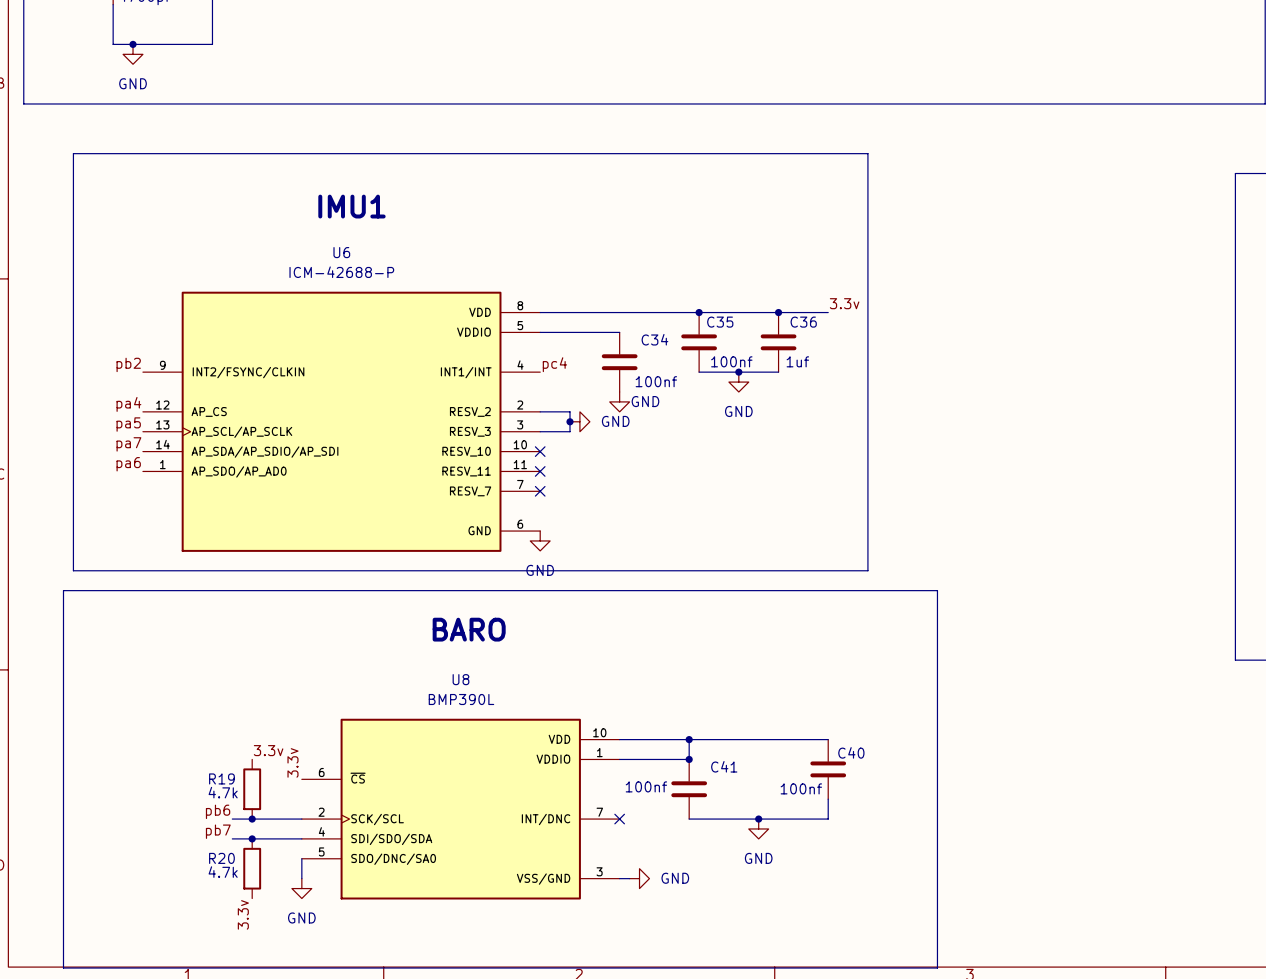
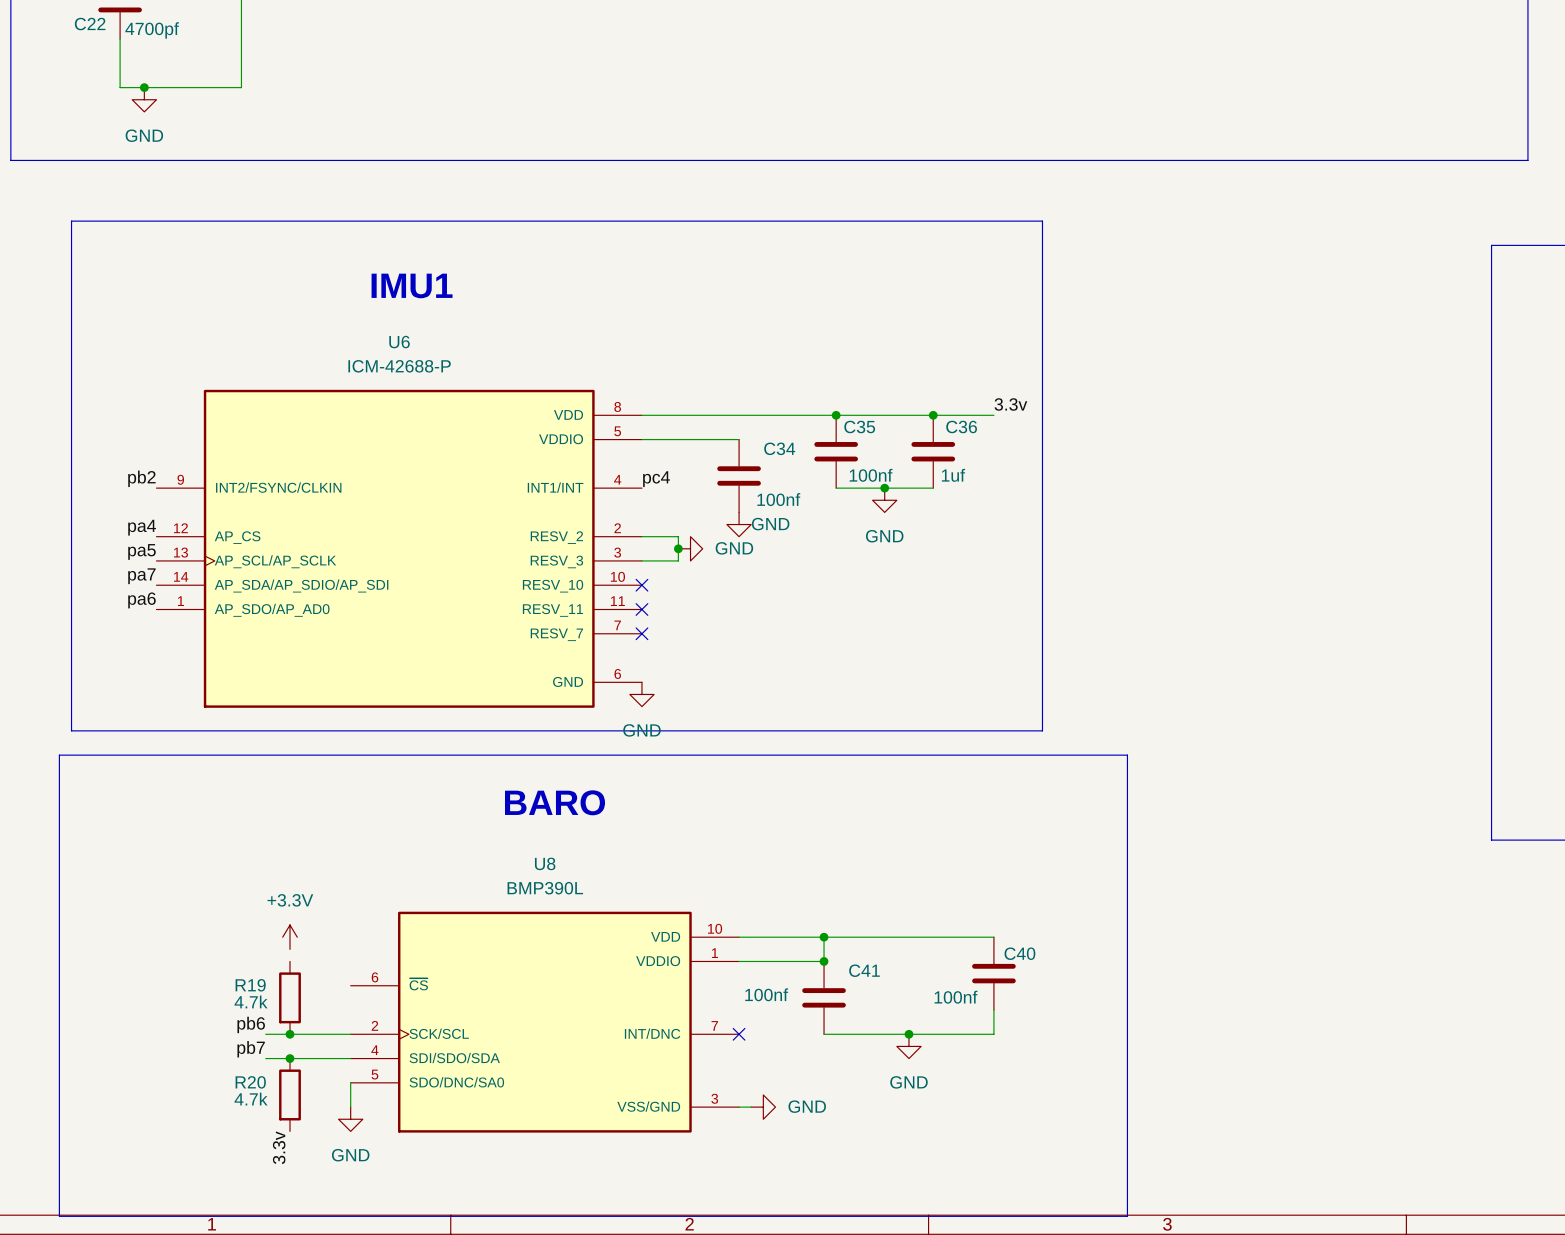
power symbol: none -> +3.3V (290, 937)
label: 3.3v (268, 750) -> none
label: 3.3v (292, 762) -> none

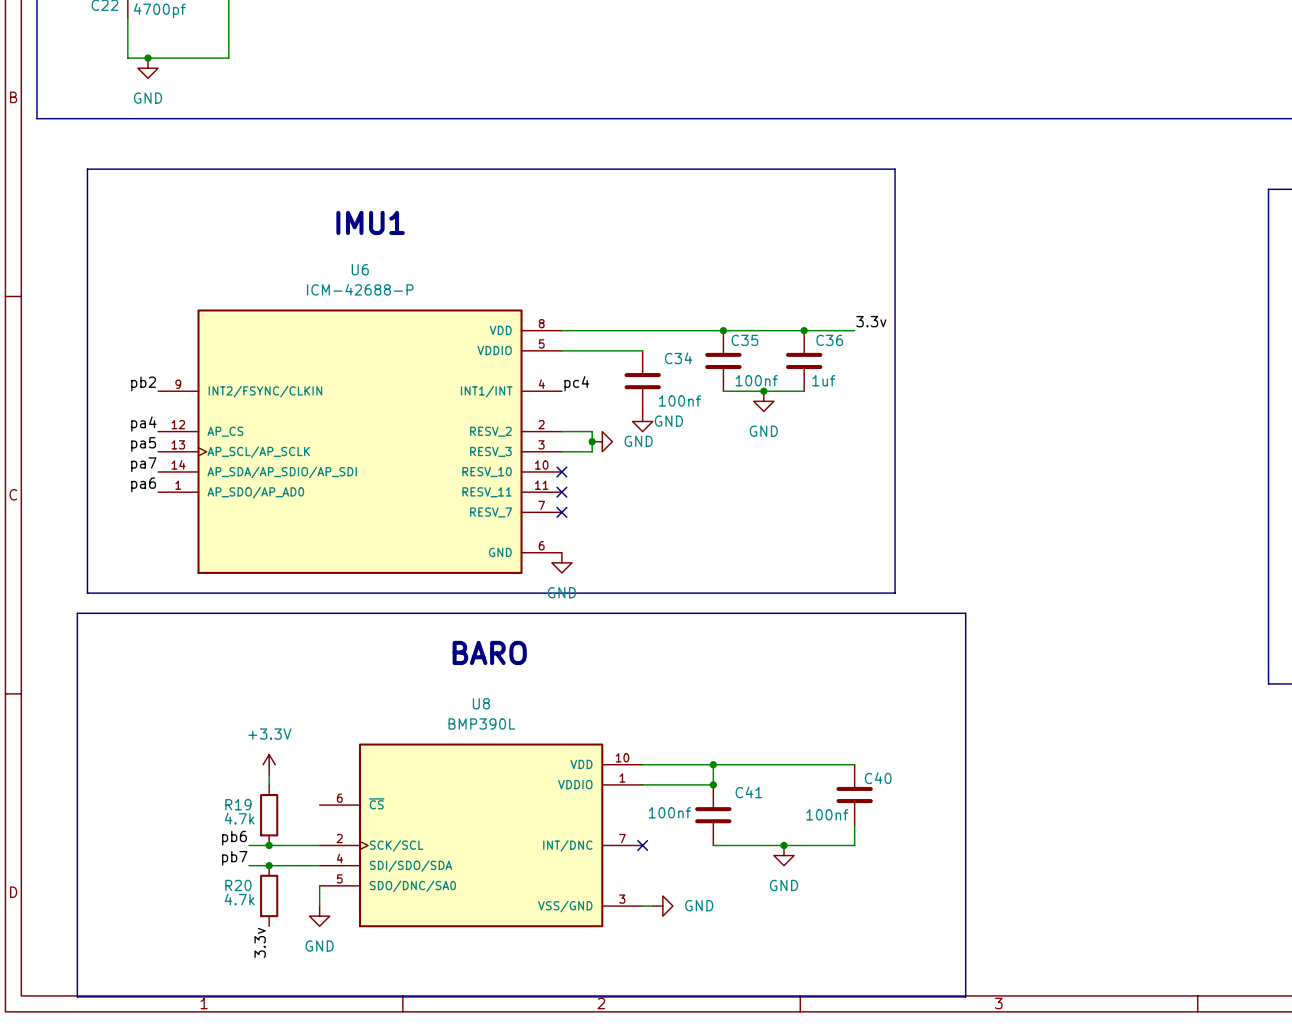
wire: none -> (269, 774) (269, 784)

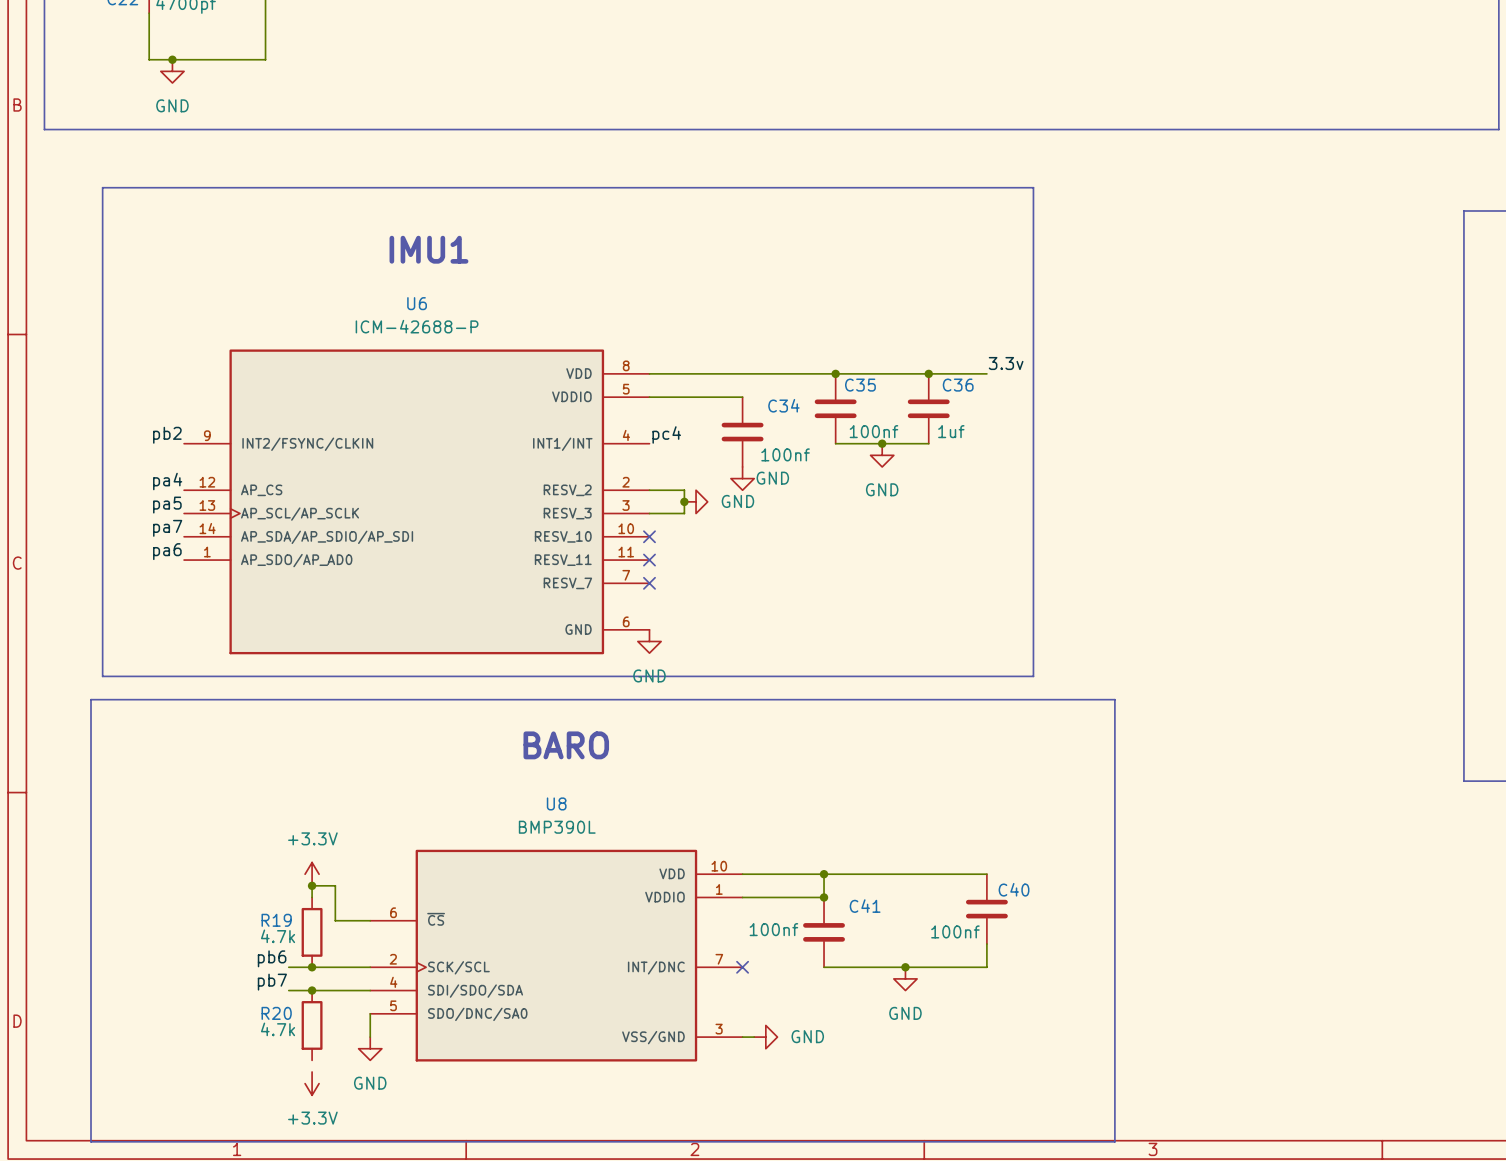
wire: none -> (312, 885) (335, 885) (335, 920) (370, 920)
junction: none -> (312, 885)
label: 3.3v (260, 942) -> none
power symbol: none -> +3.3V (312, 1083)

